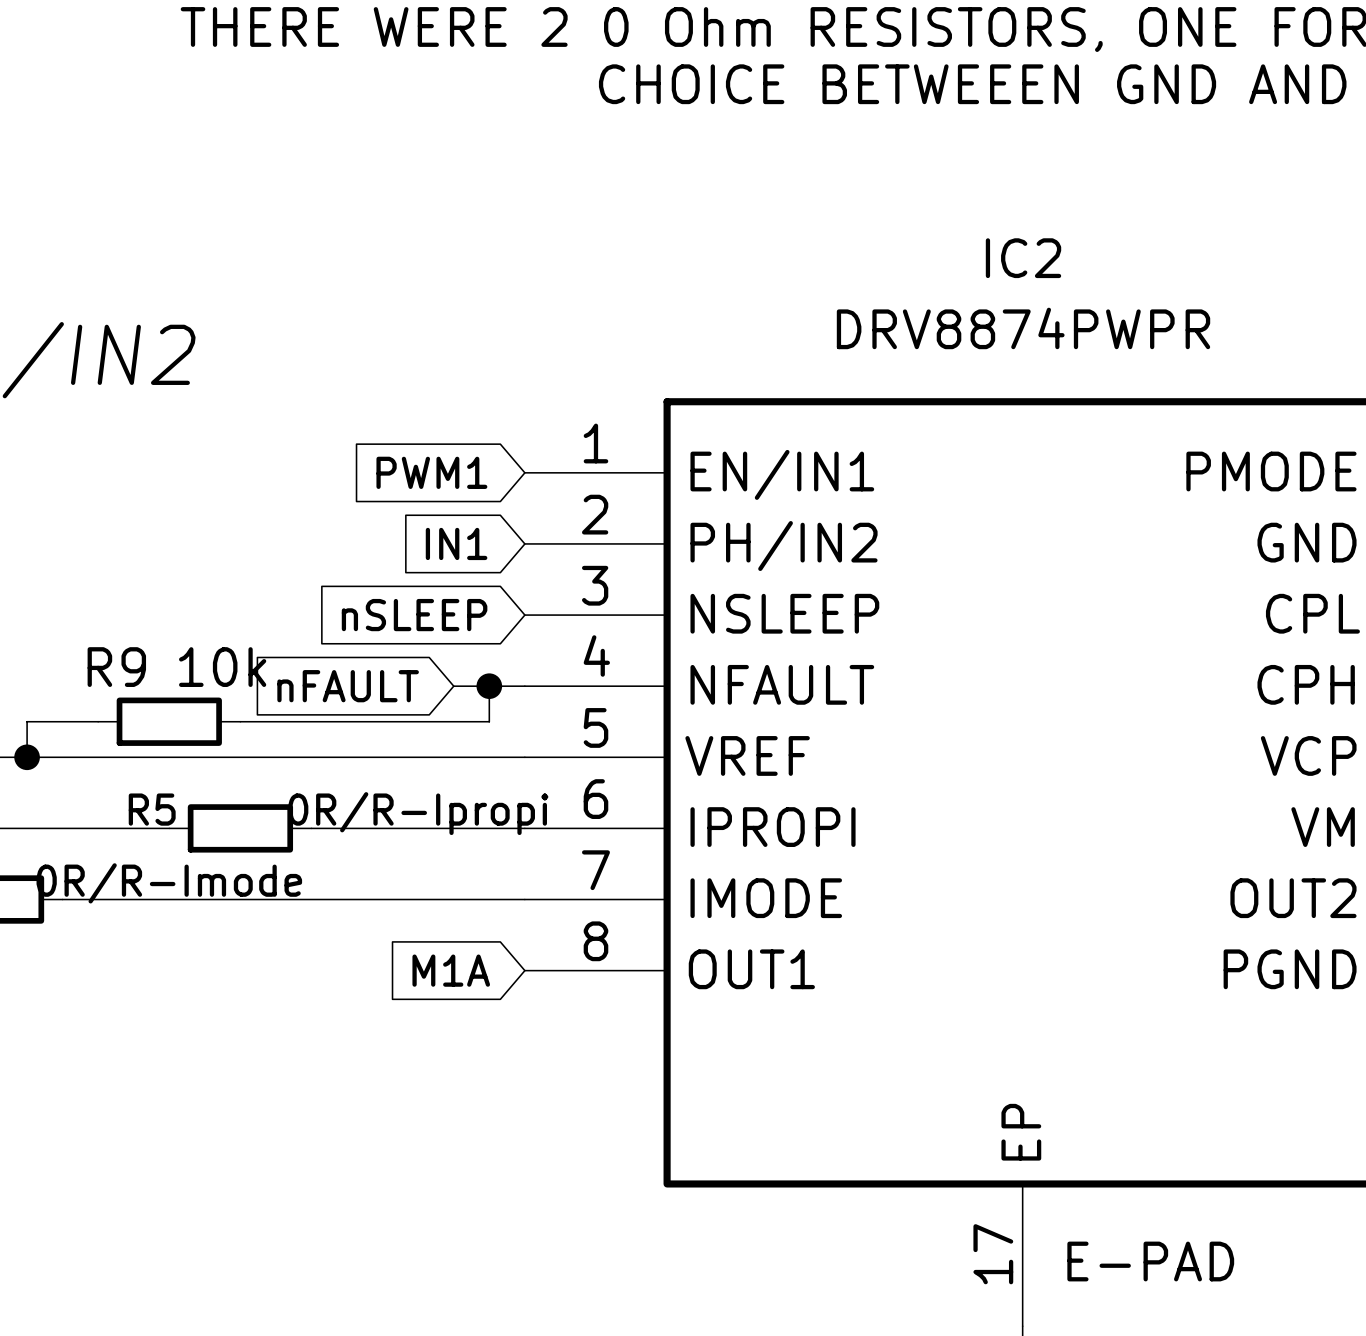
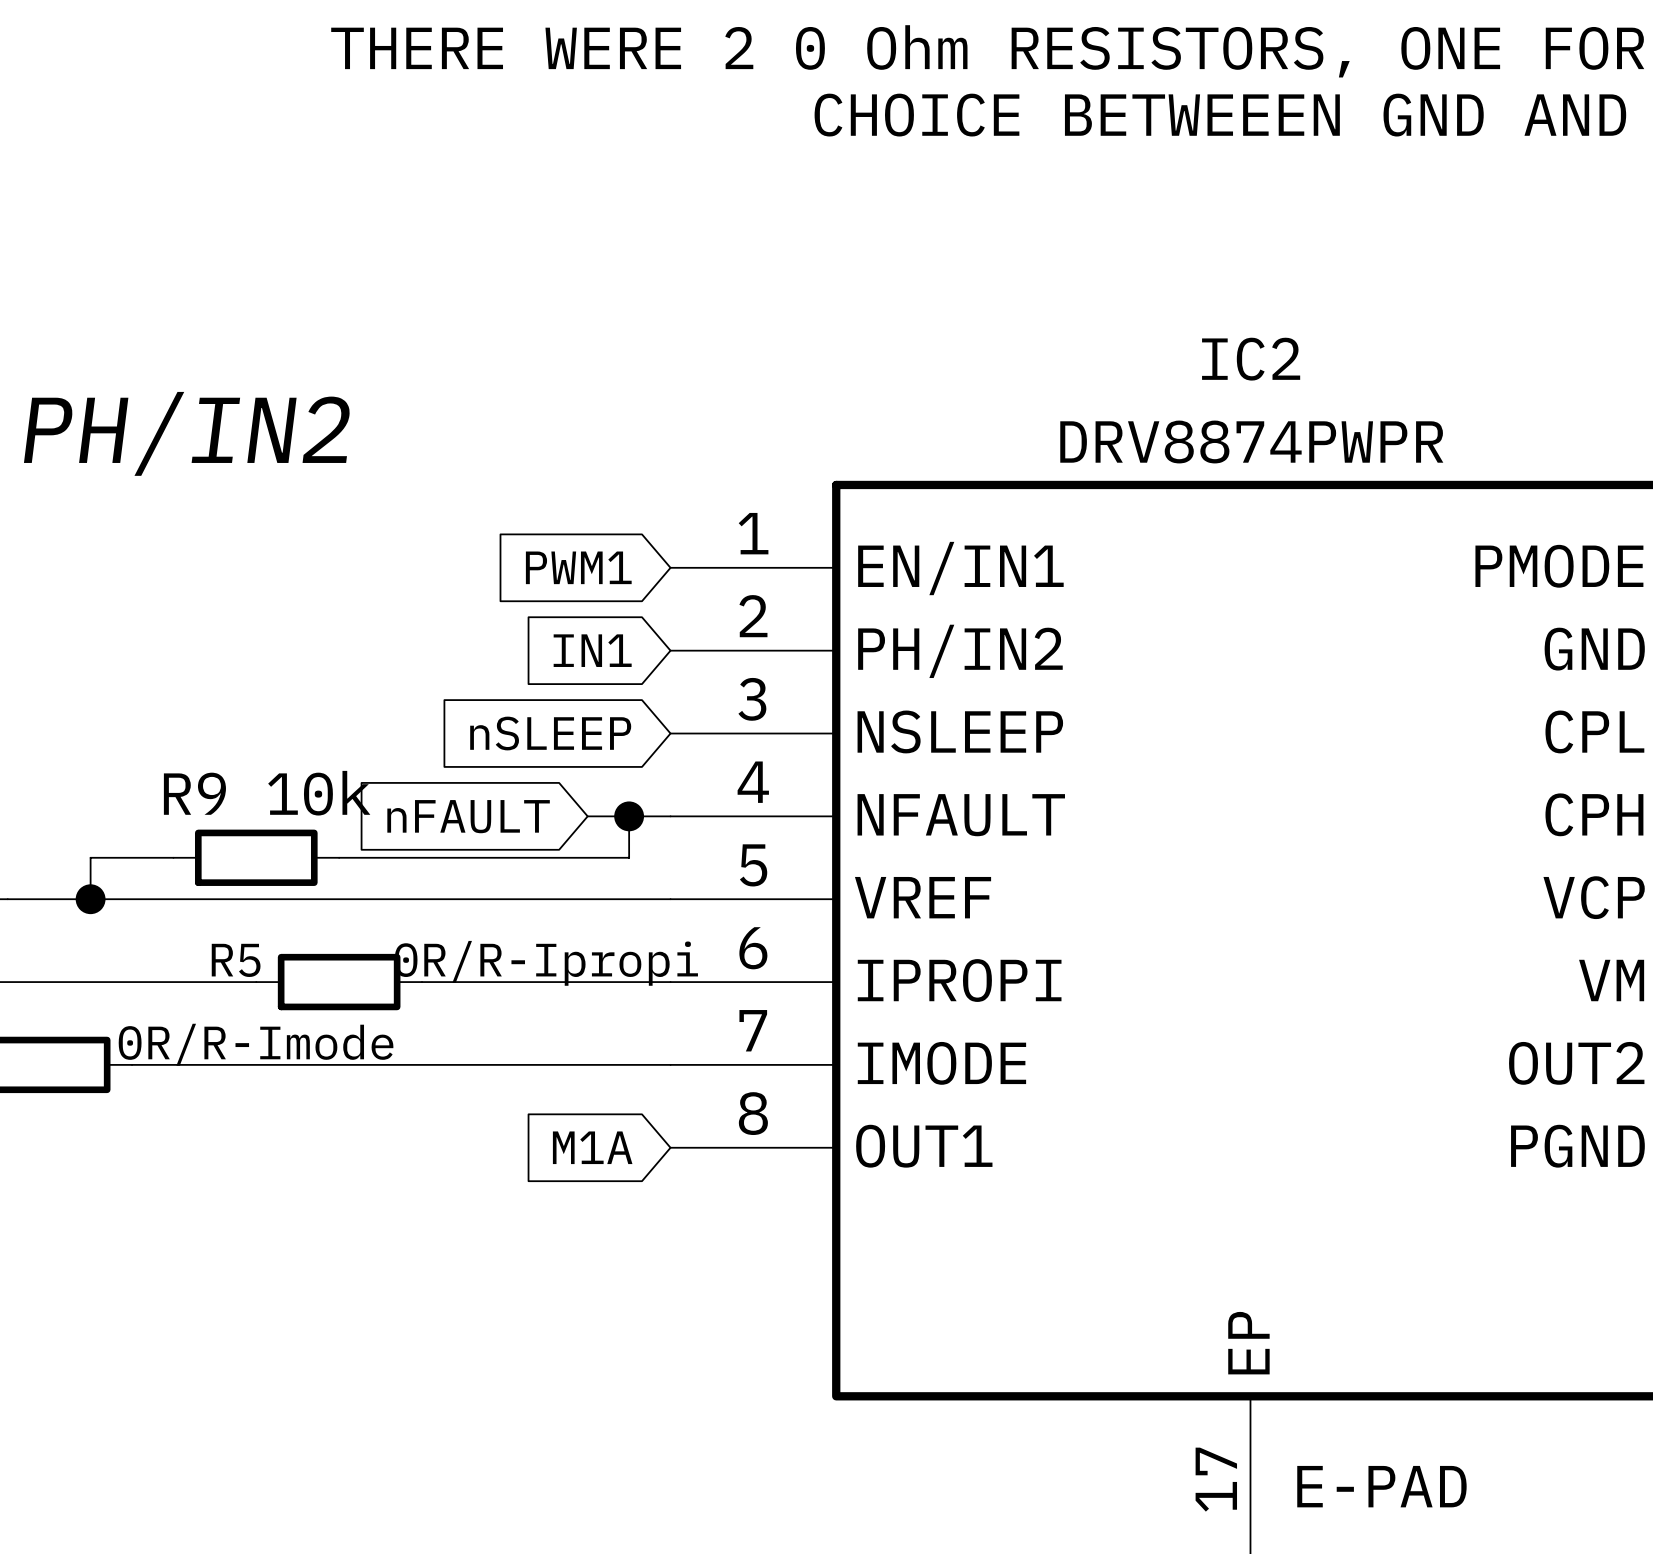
IC2 name position: IC2 (1023, 258) -> IC2 (1251, 359)
IC2 value position: DRV8874PWPR (1023, 328) -> DRV8874PWPR (1251, 441)

